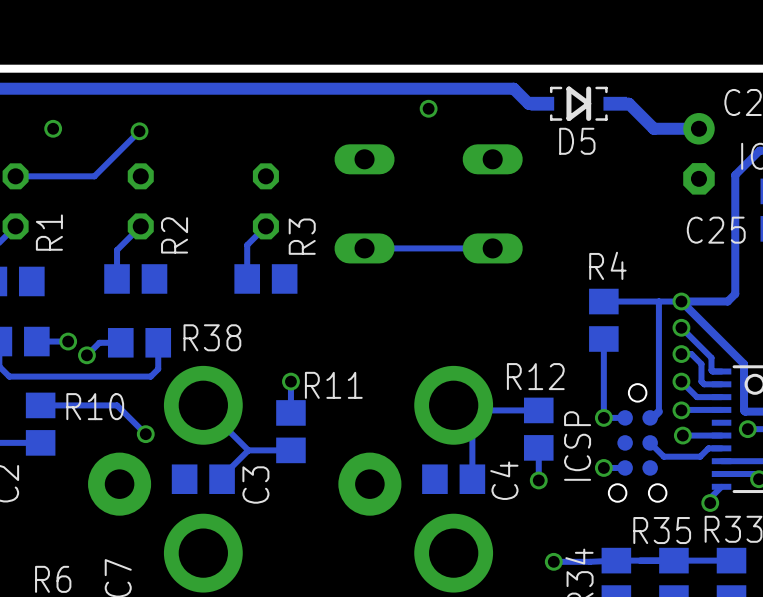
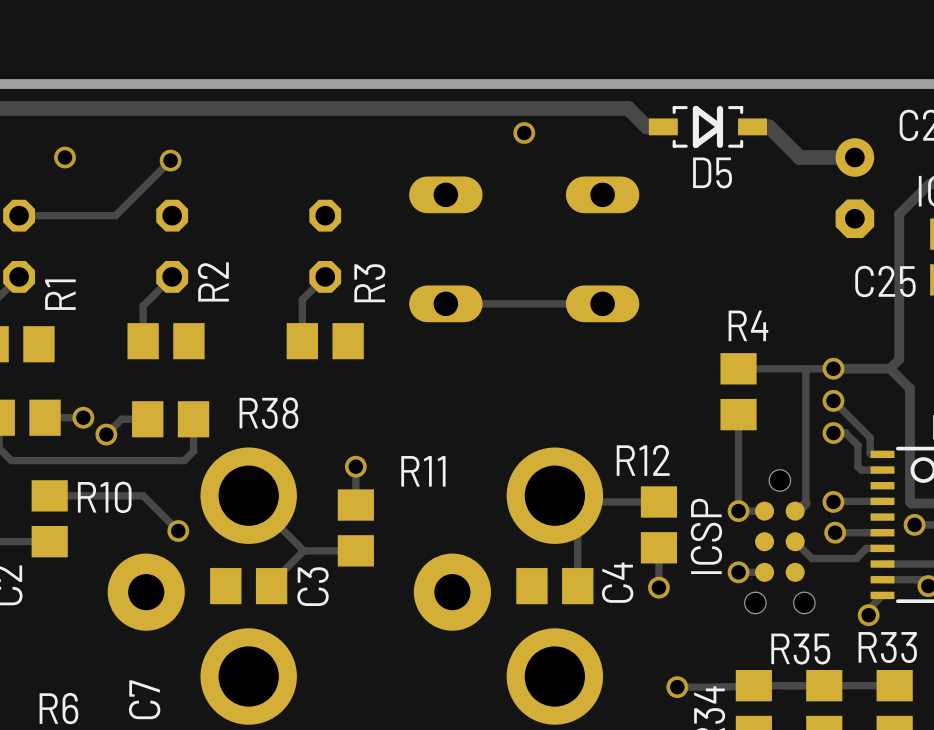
track: (681, 301) (744, 364) -> (890, 368) (909, 388) (909, 445)
track: (681, 381) (696, 397) (721, 397) -> none
via: (681, 381) -> none

